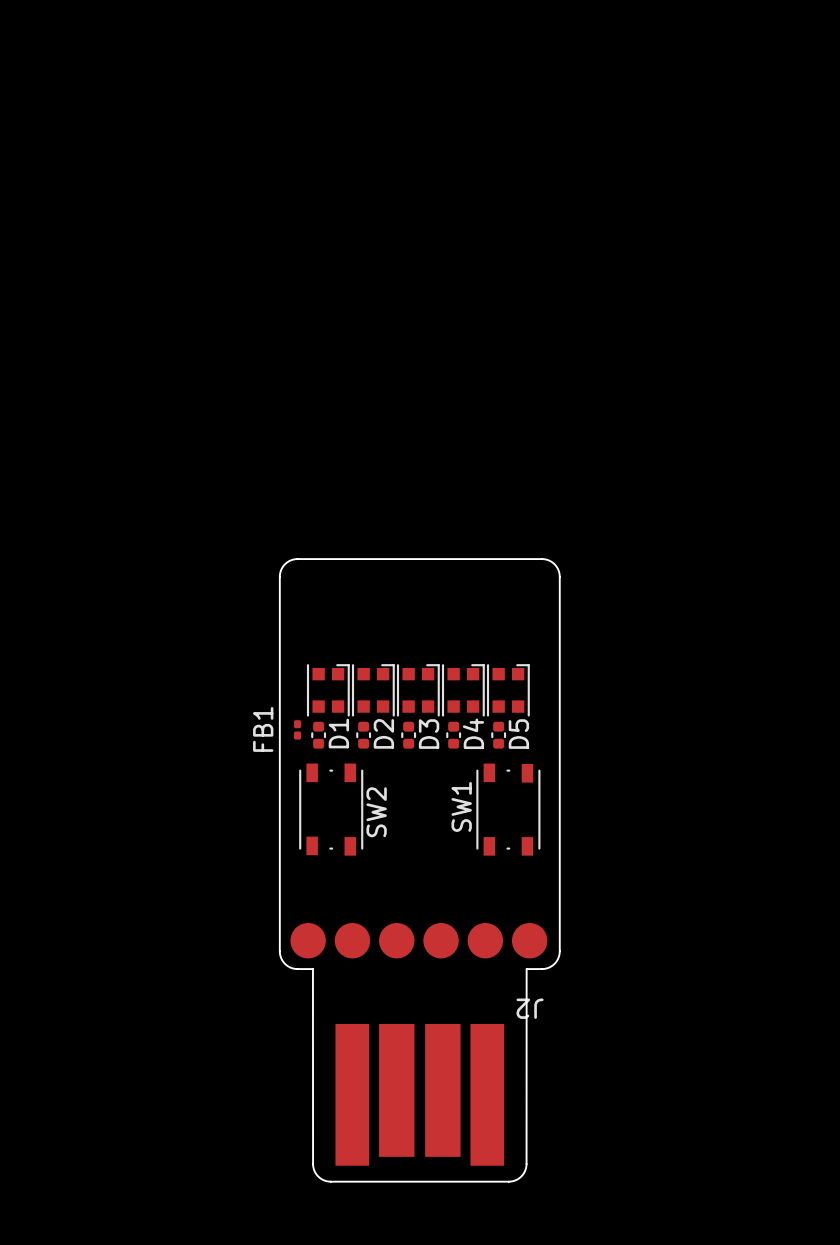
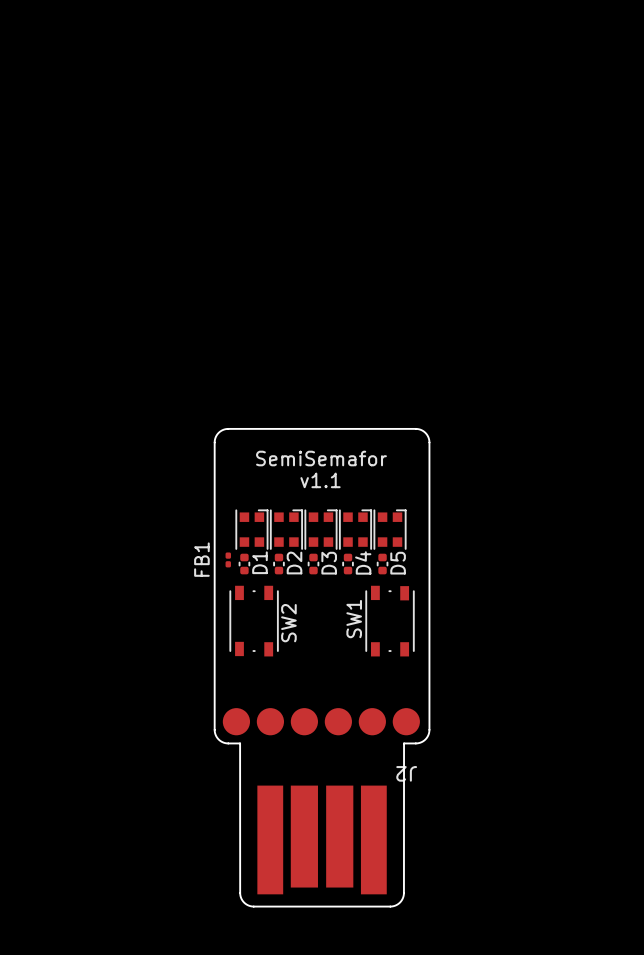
text: none -> SemiSemafor (321, 458)
text: none -> v1.1 (320, 480)

